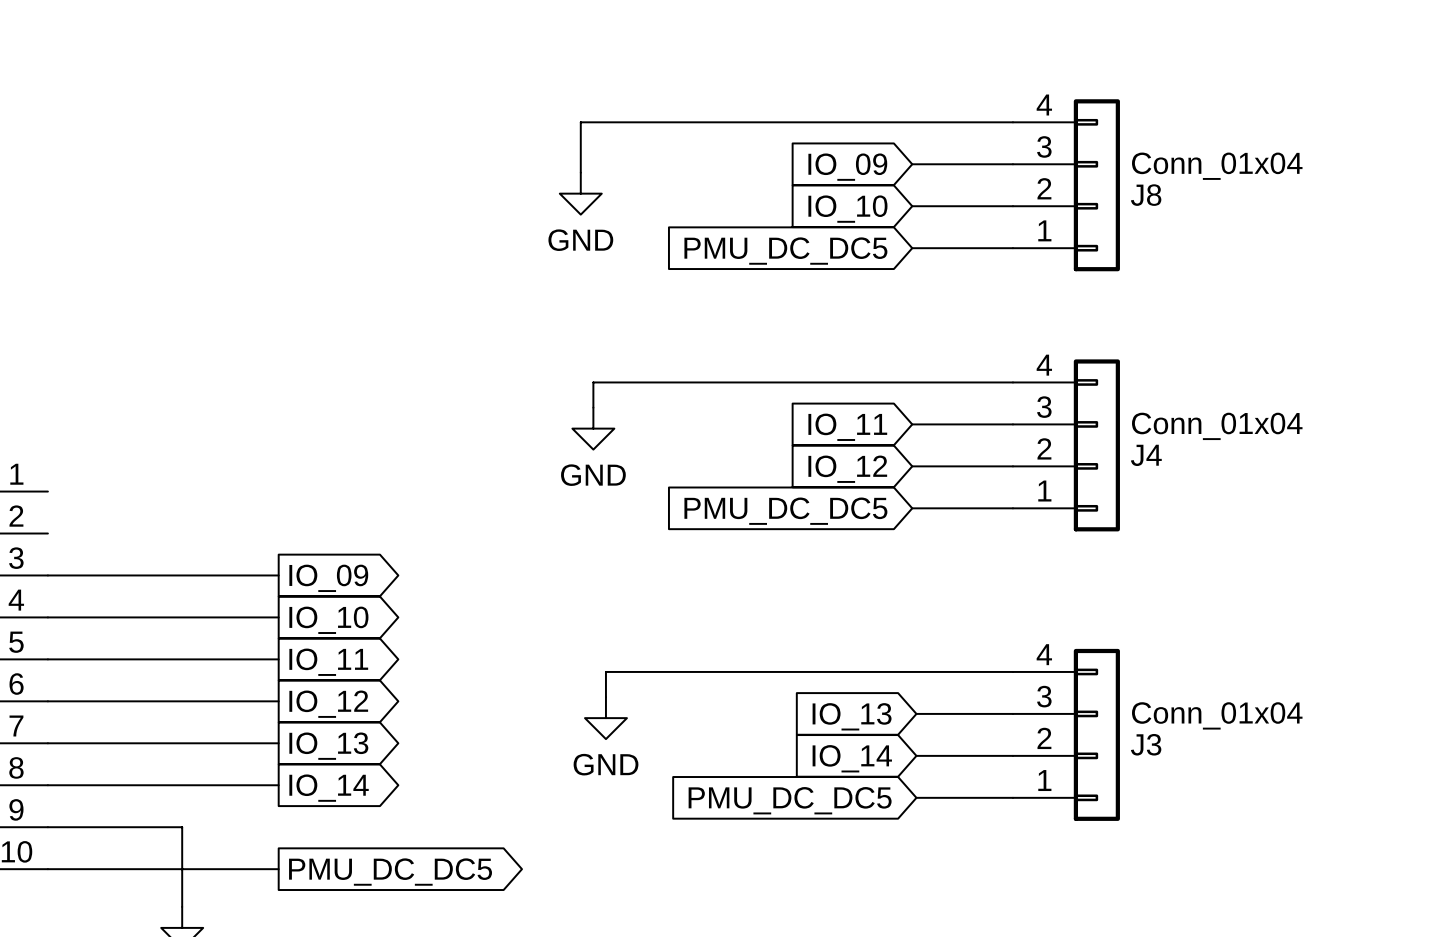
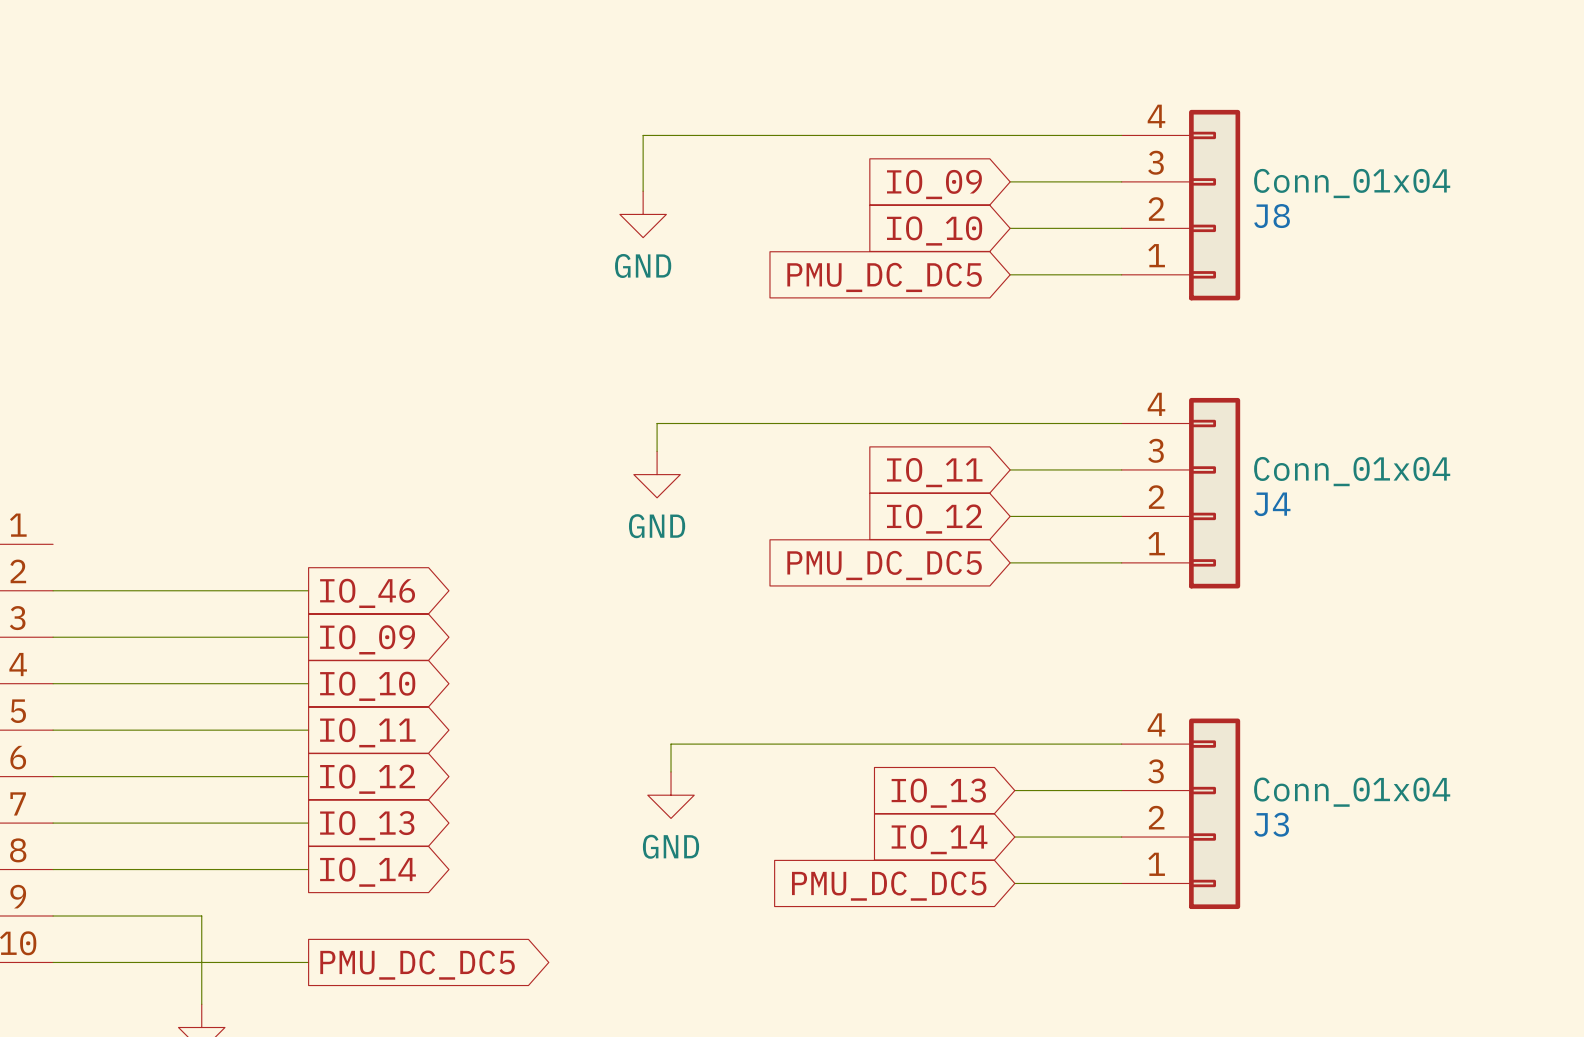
wire: none -> (53, 590) (308, 590)
global label: none -> IO_46 (367, 593)

